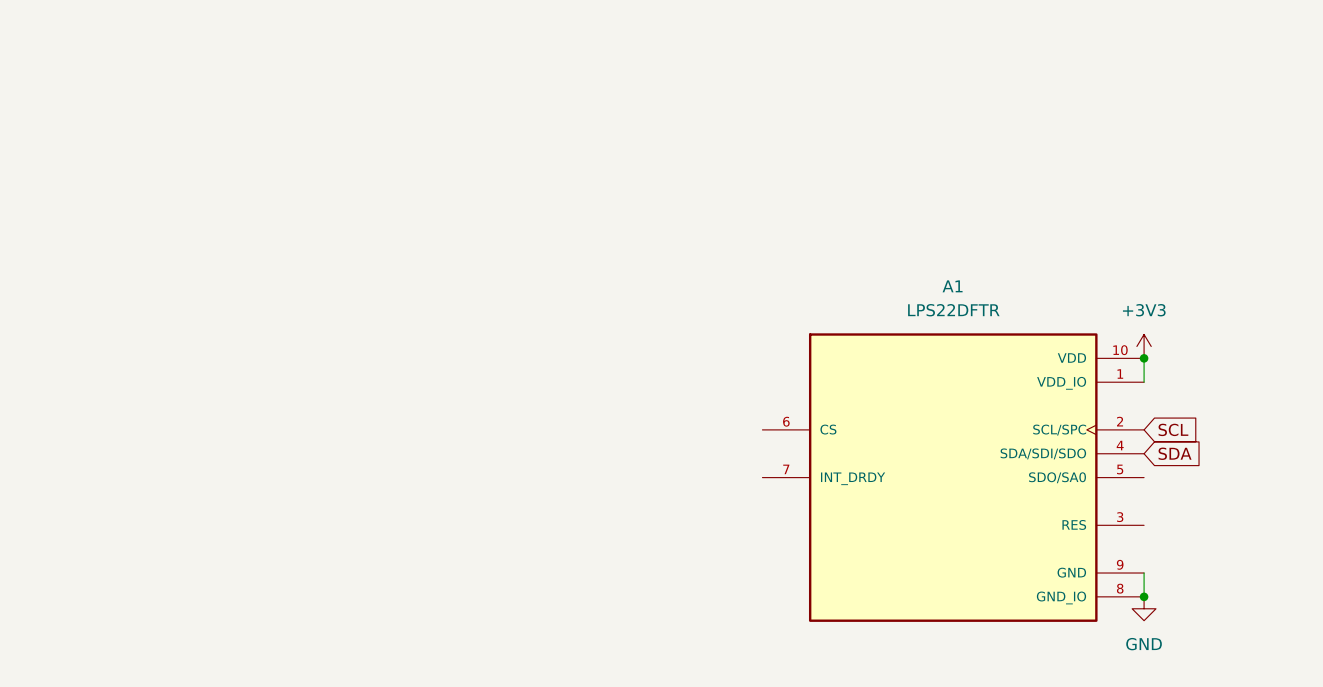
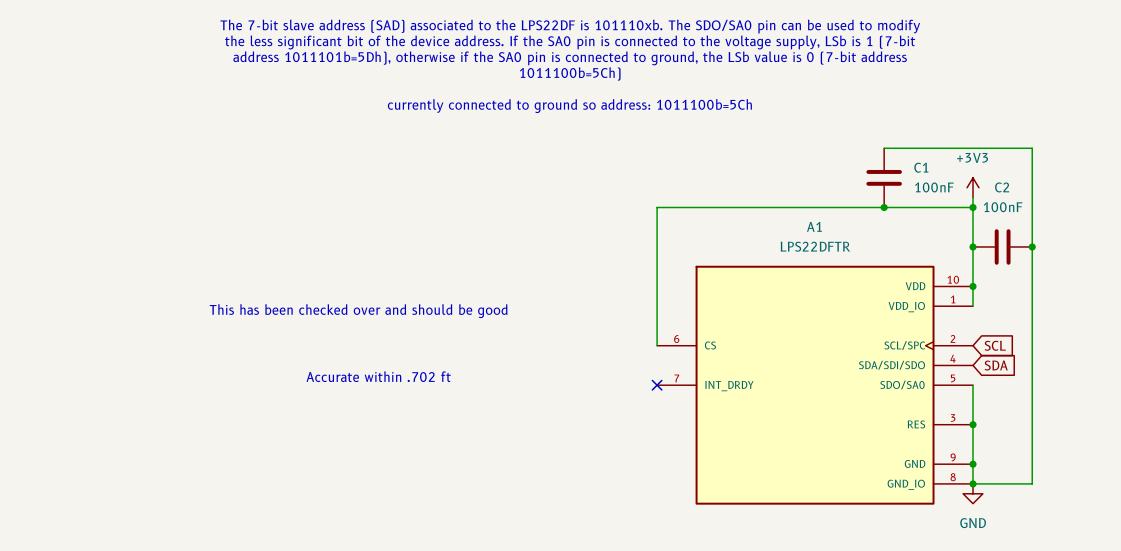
text: none -> The 7-bit slave address (SAD) associated to the LPS22DF is 101110xb. The SDO/SA0 pin can be used to modify (570, 26)
text: none -> the less significant bit of the device address. If the SA0 pin is connected to the voltage supply, LSb is 1 (7-bit (570, 42)
text: none -> address 1011101b=5Dh), otherwise if the SA0 pin is connected to ground, the LSb value is 0 (7-bit address (570, 58)
text: none -> 1011100b=5Ch) (570, 73)
text: none -> currently connected to ground so address: 1011100b=5Ch (569, 106)
wire: none -> (884, 148) (1032, 148) (1032, 483) (973, 483)
C1: none -> 100nF (884, 177)
wire: none -> (973, 197) (973, 286)
junction: none -> (884, 207)
wire: none -> (973, 207) (657, 207) (657, 345)
junction: none -> (973, 207)
junction: none -> (973, 246)
C2: none -> 100nF (1002, 246)
junction: none -> (1032, 246)
power symbol position: +3V3 (1144, 346) -> +3V3 (973, 187)
text: none -> This has been checked over and should be good (358, 311)
text: none -> Accurate within .702 ft (378, 376)
no-connect mark: none -> (657, 385)
wire: none -> (973, 385) (973, 464)
junction: none -> (973, 424)
junction: none -> (973, 464)

